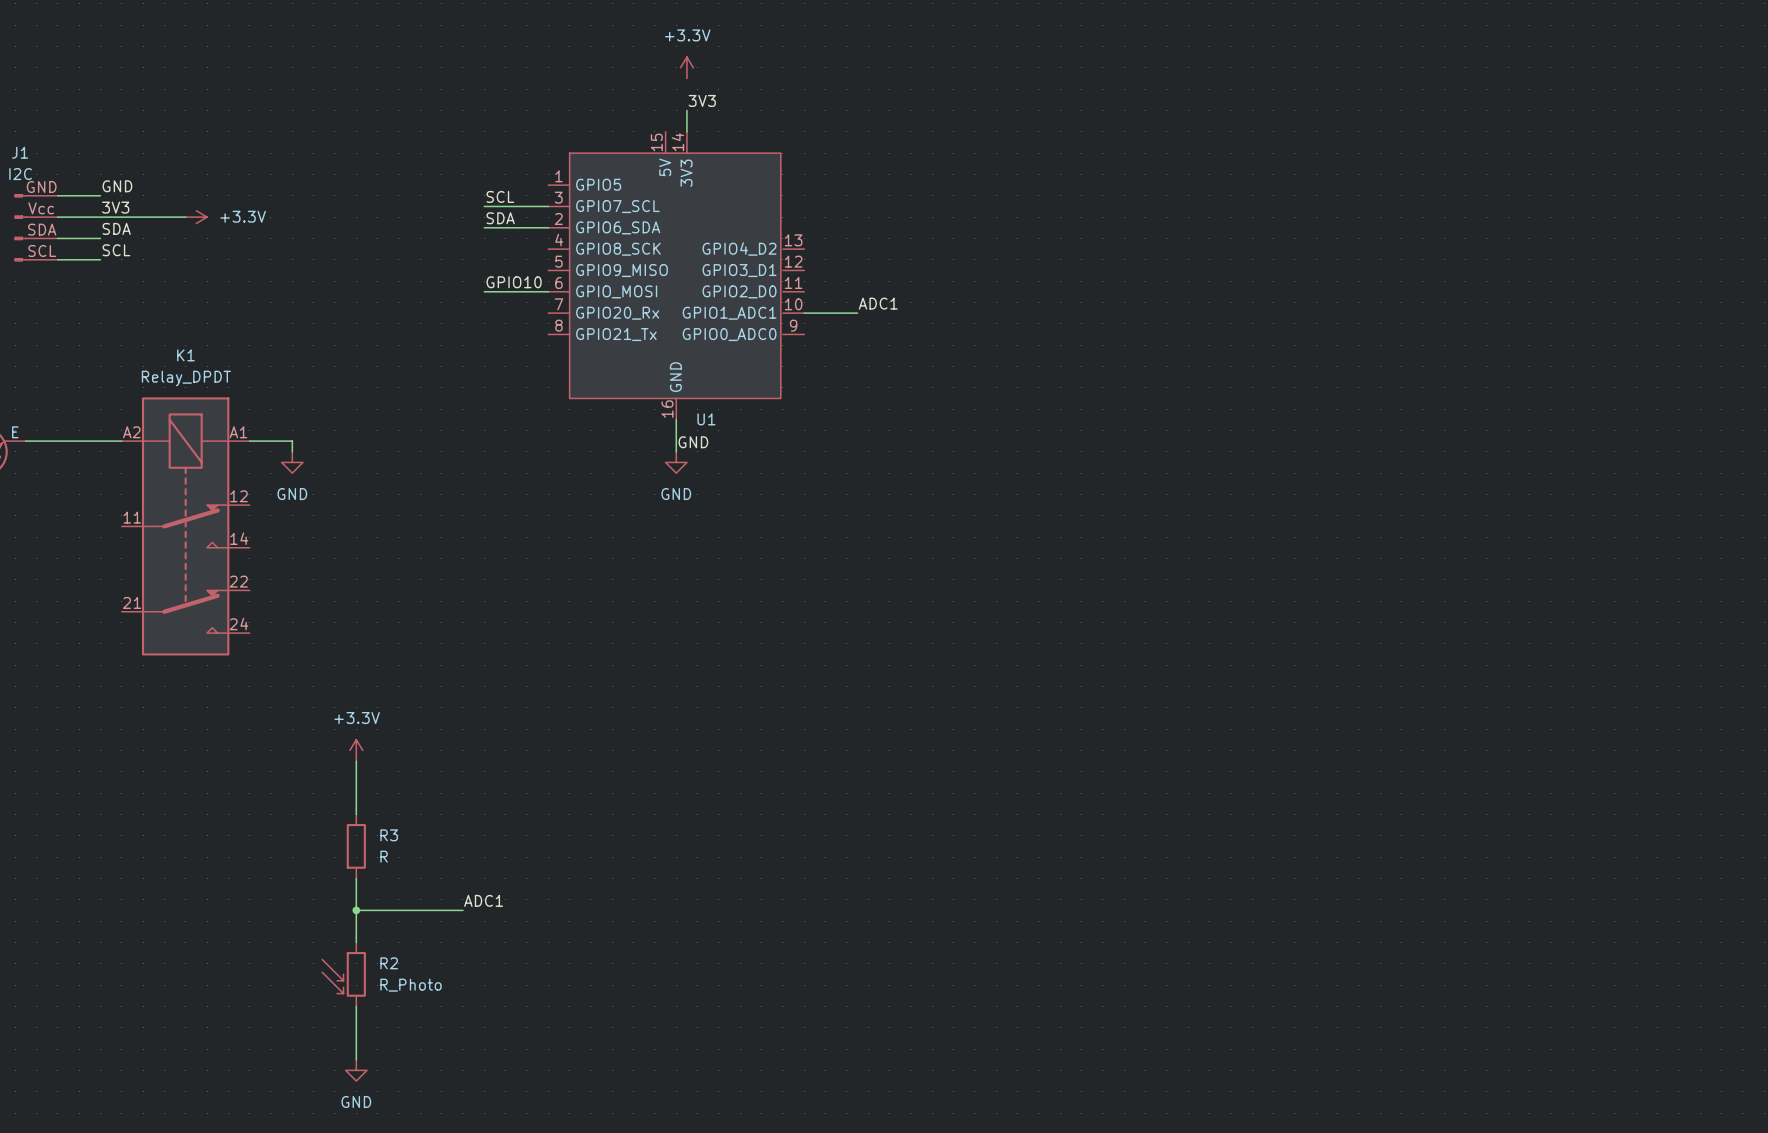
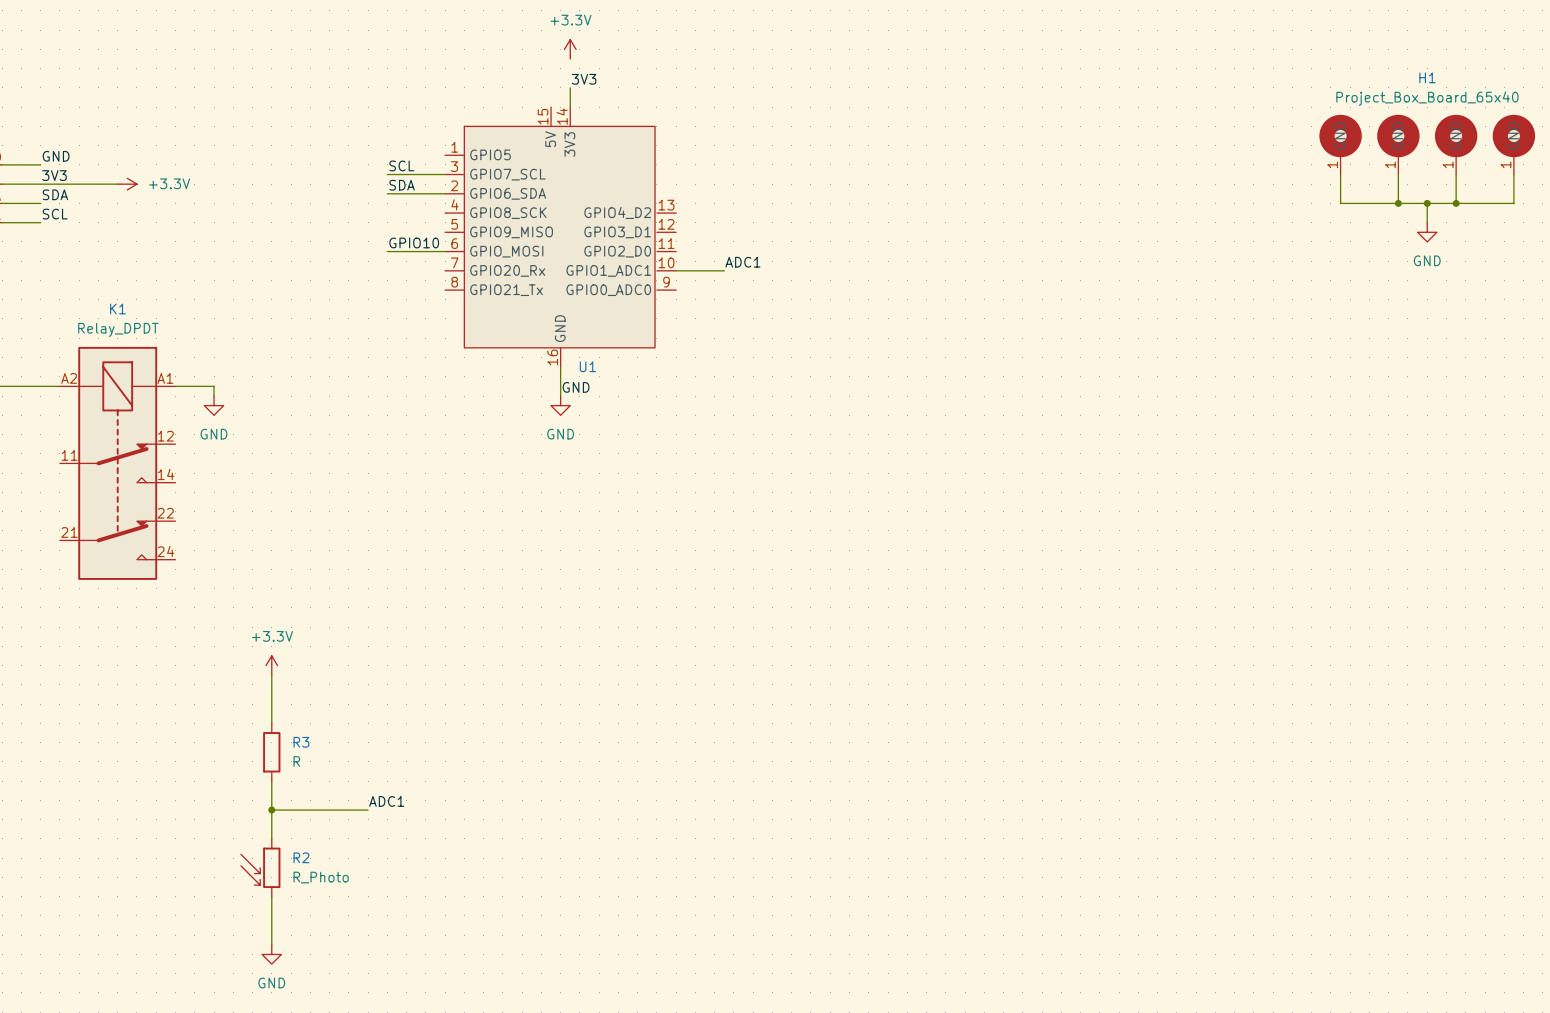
H1: none -> Project_Box_Board_65x40 (1427, 144)
wire: none -> (1340, 174) (1340, 203) (1513, 203) (1513, 174)
wire: none -> (1398, 174) (1398, 203)
wire: none -> (1456, 174) (1456, 203)
junction: none -> (1398, 203)
wire: none -> (1427, 203) (1427, 222)
junction: none -> (1427, 203)
junction: none -> (1456, 203)
power symbol: none -> GND (1427, 232)

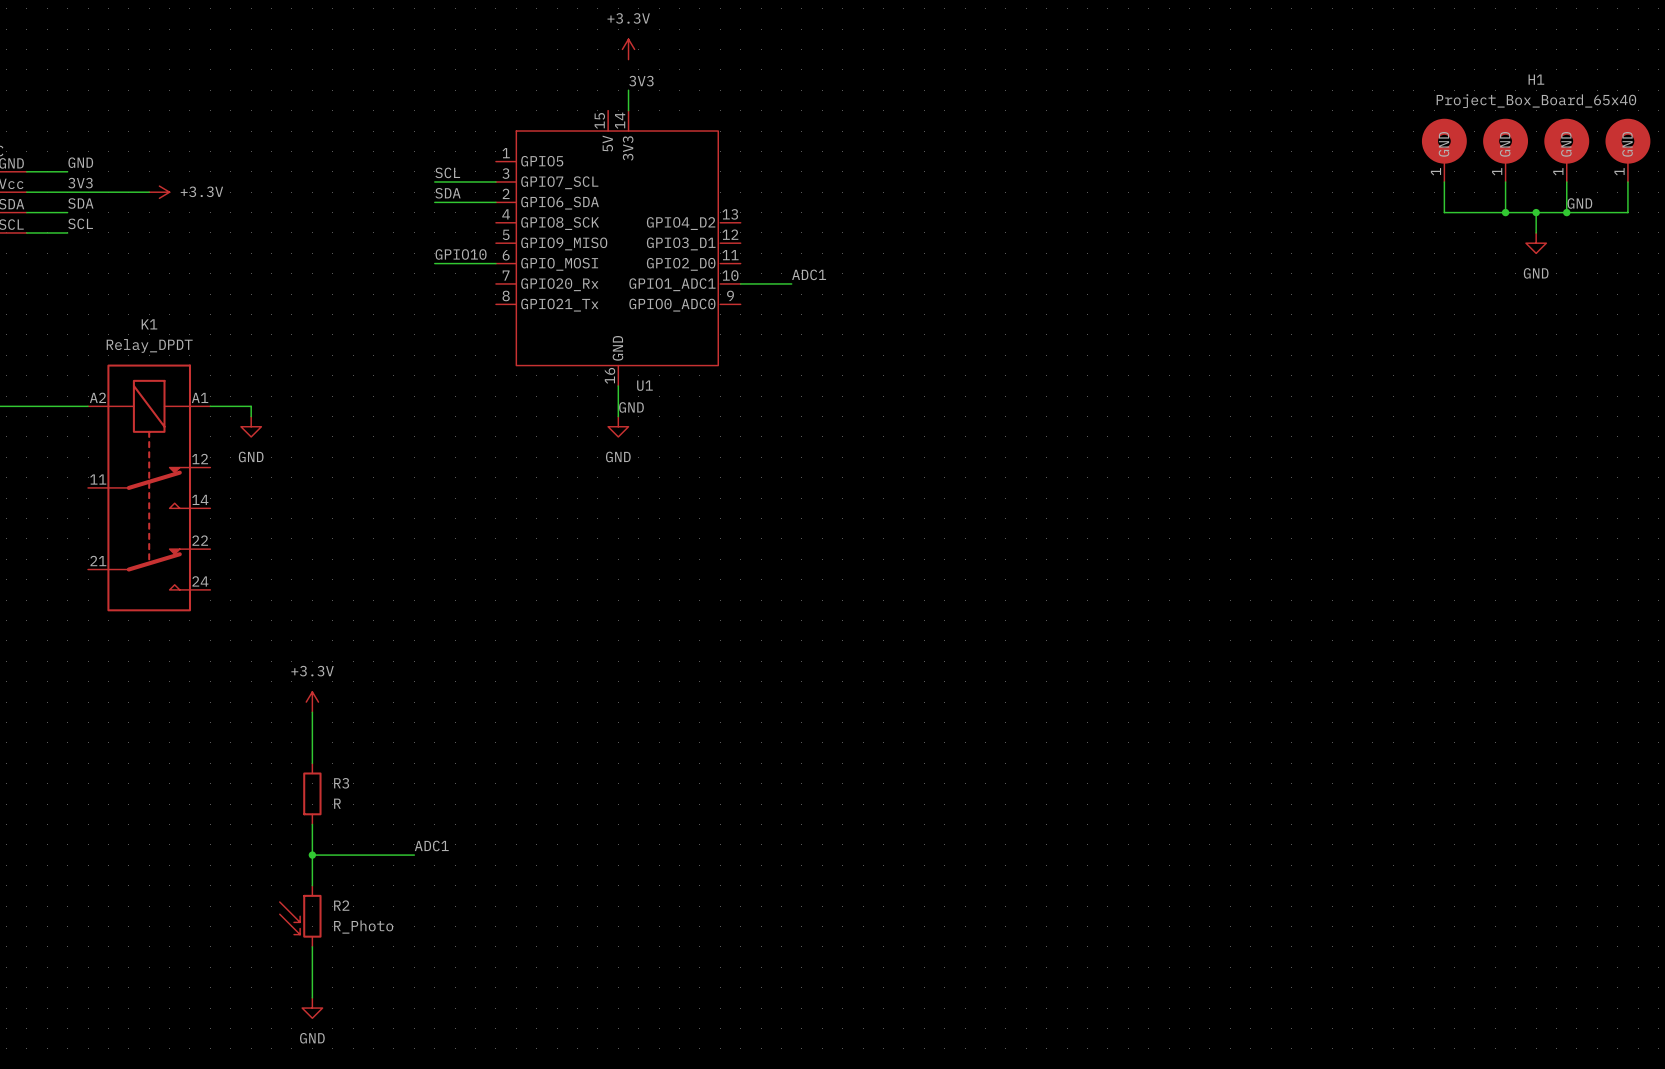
label: none -> GND (1579, 203)

